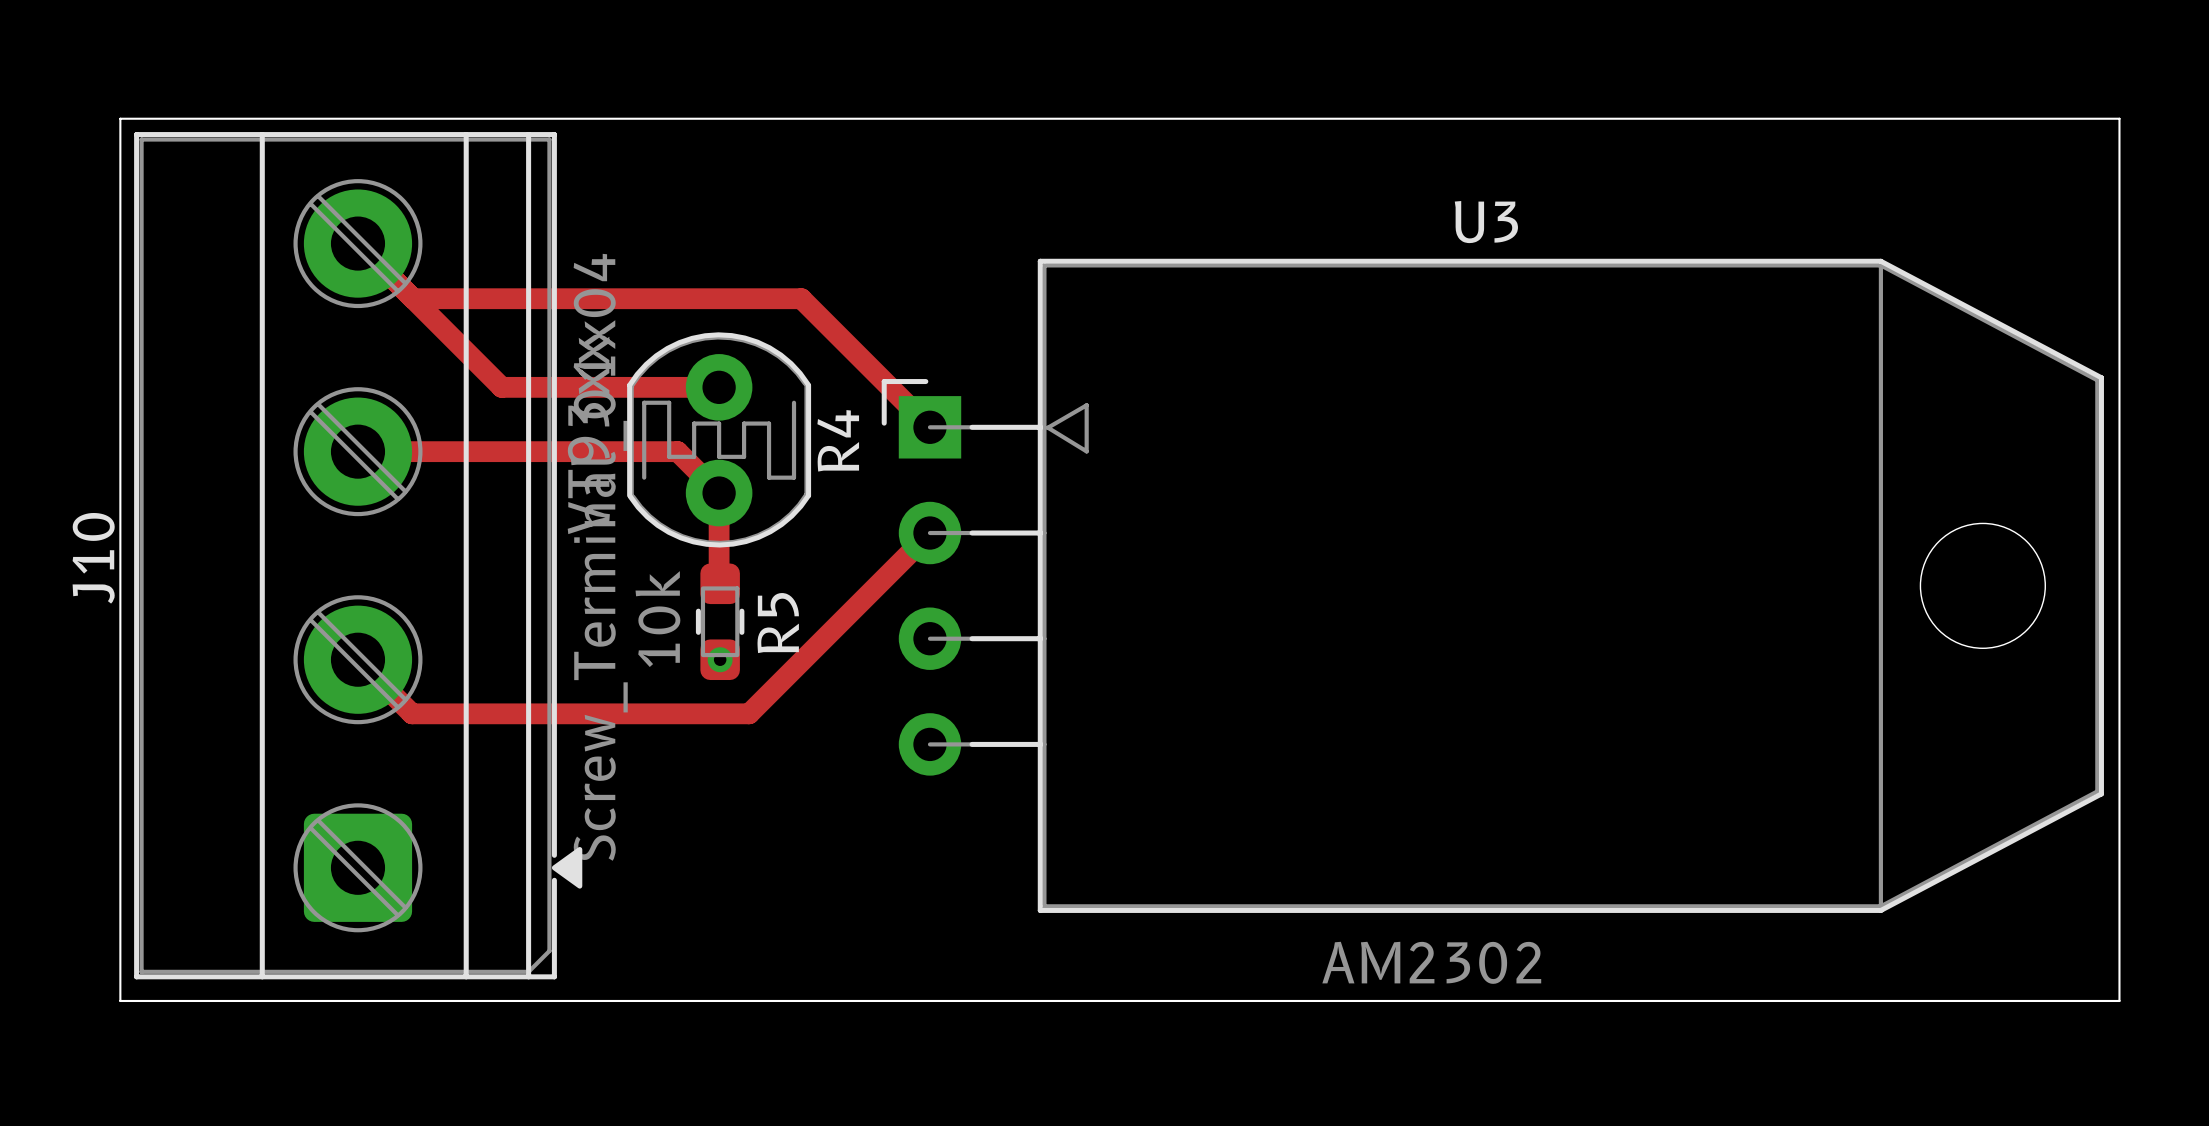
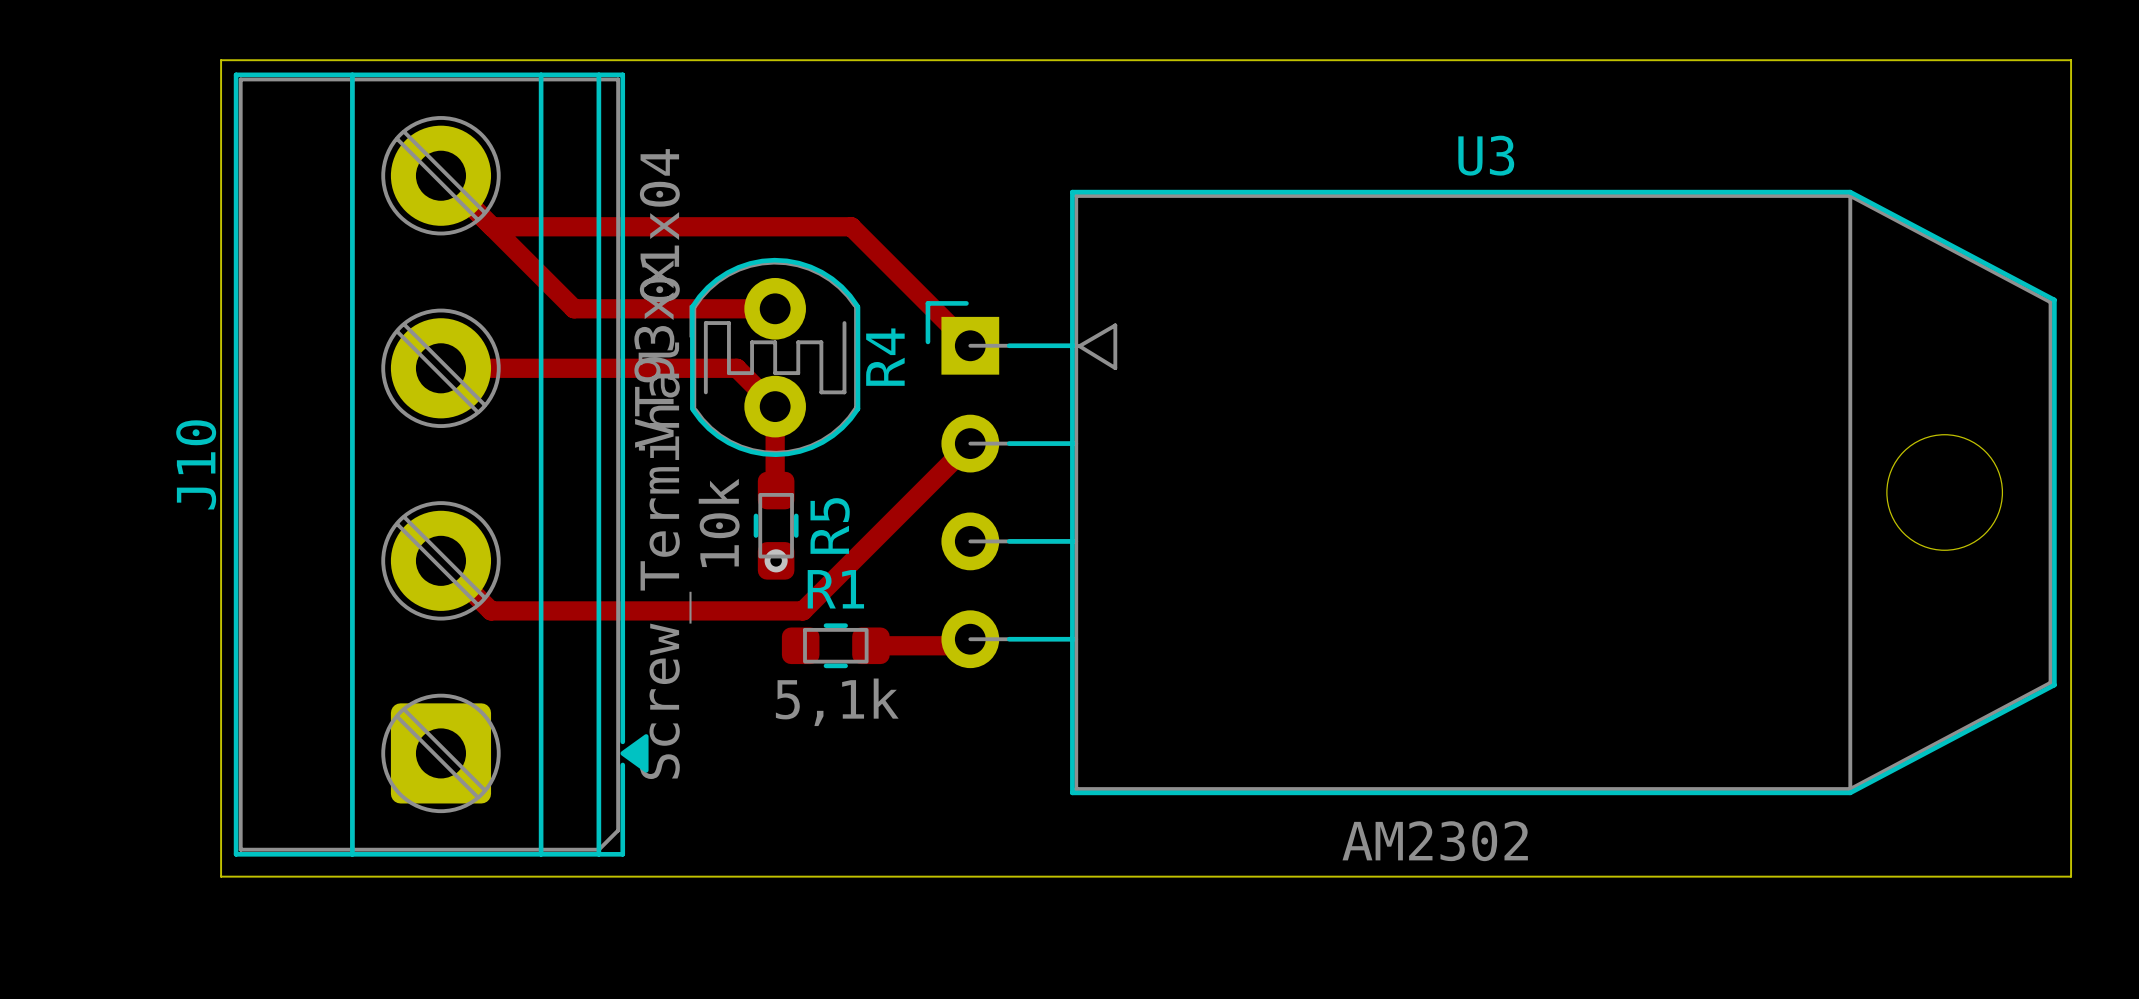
track: none -> (970, 639) (963, 645) (870, 645)
R1: none -> 5,1k (835, 645)

